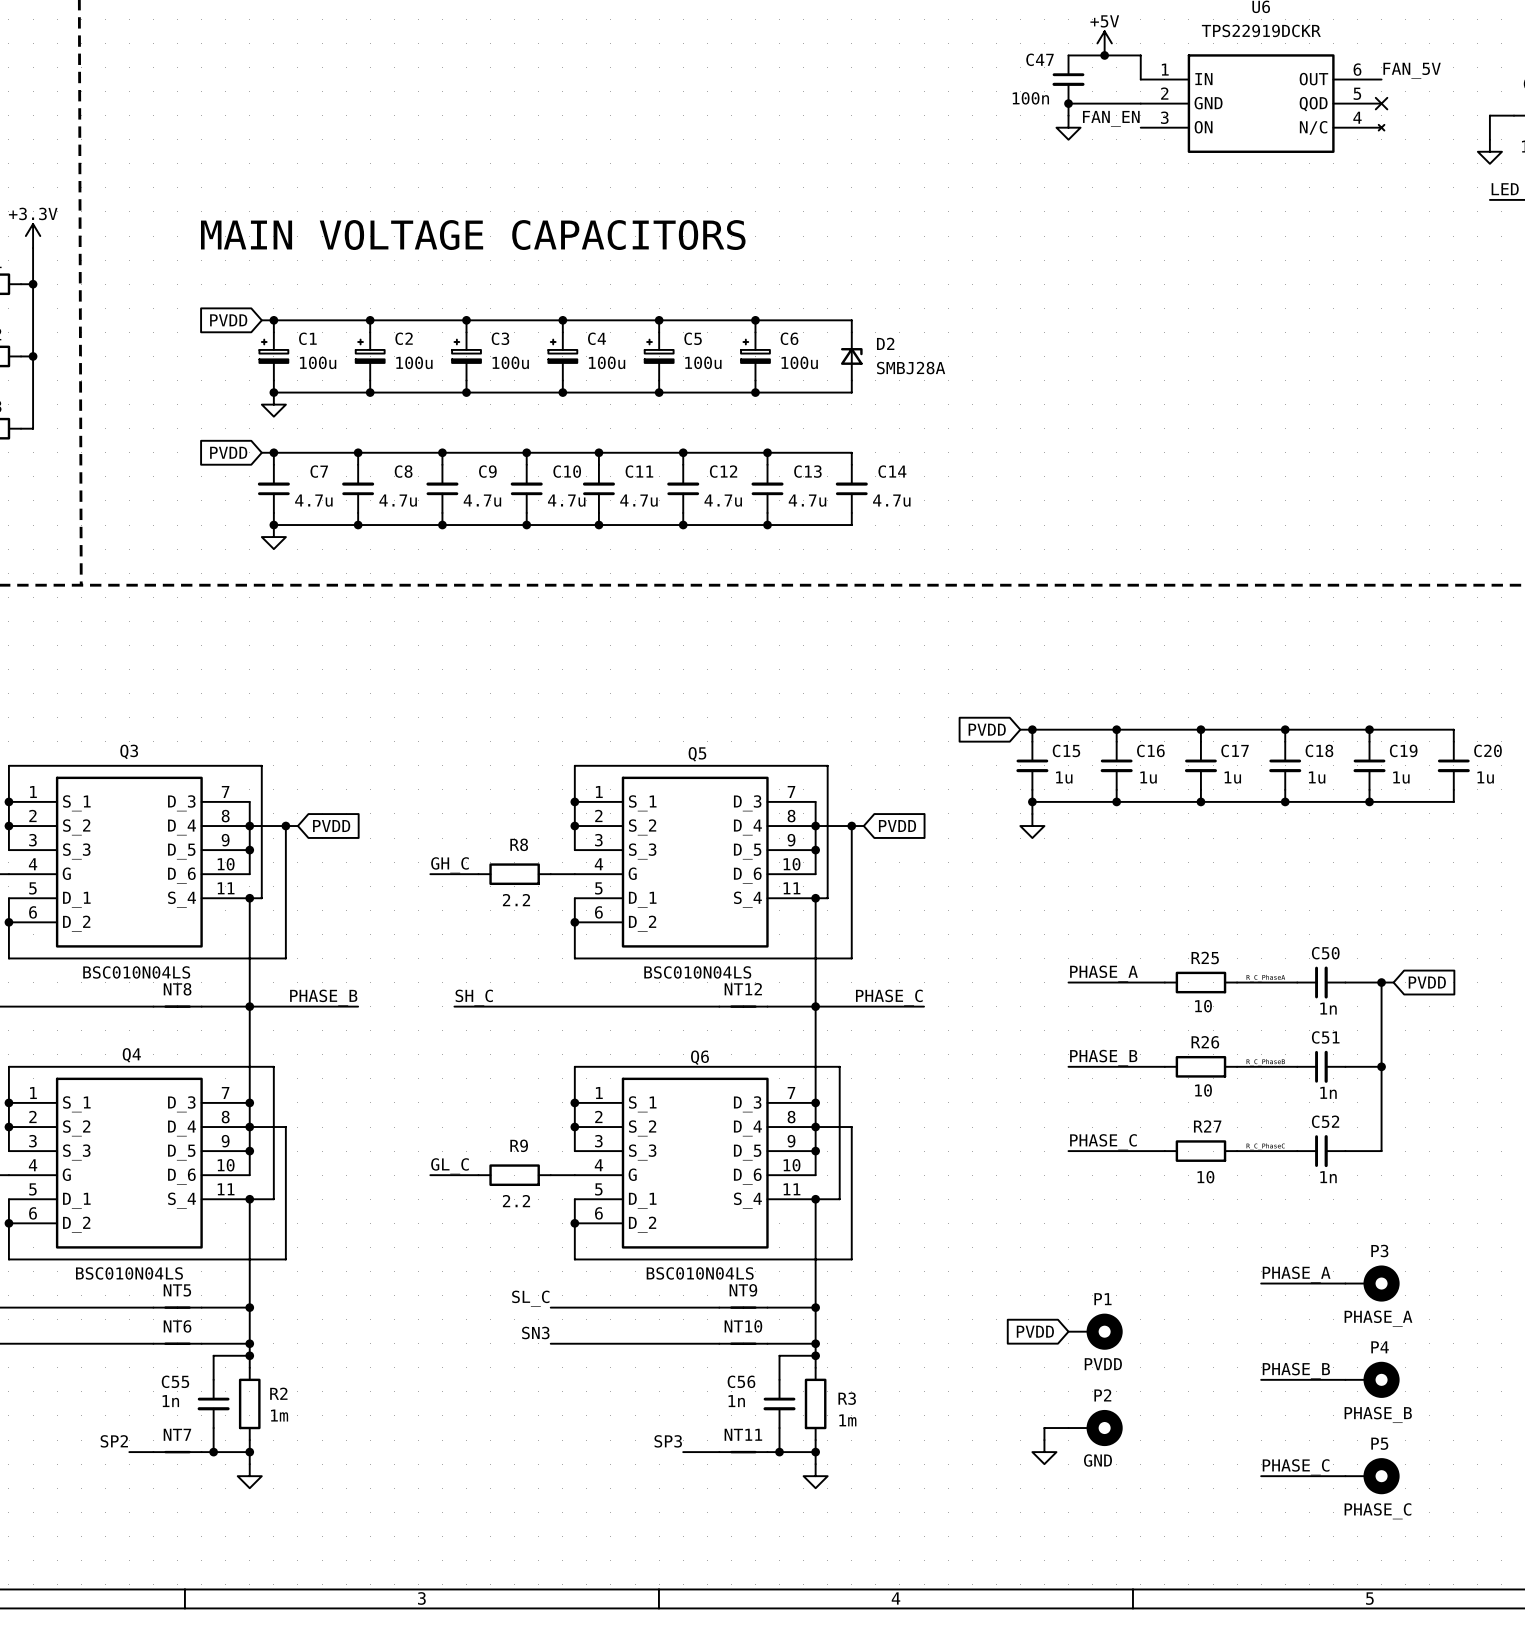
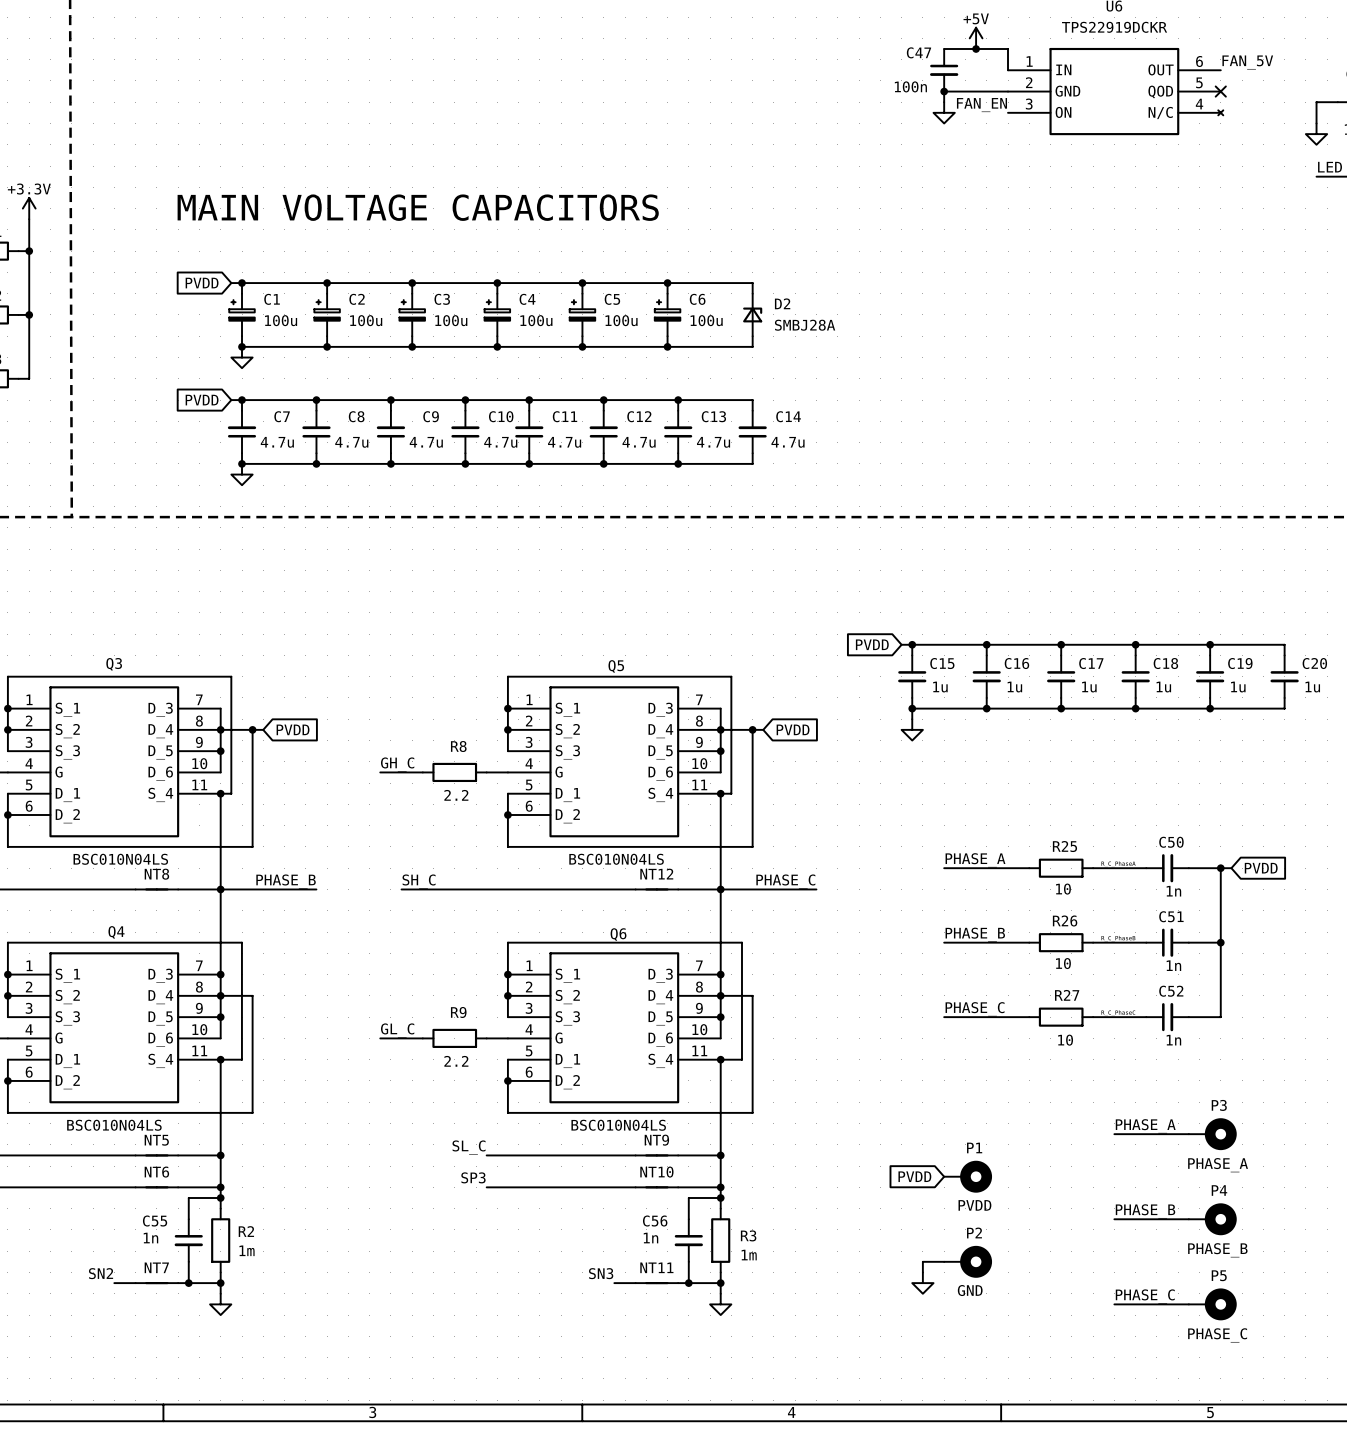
label: SN3 (535, 1333) -> SP3 (473, 1177)
label: SP2 (114, 1441) -> SN2 (101, 1273)
label: SP3 (668, 1441) -> SN3 (601, 1273)
wire: (683, 1452) (695, 1452) -> none

